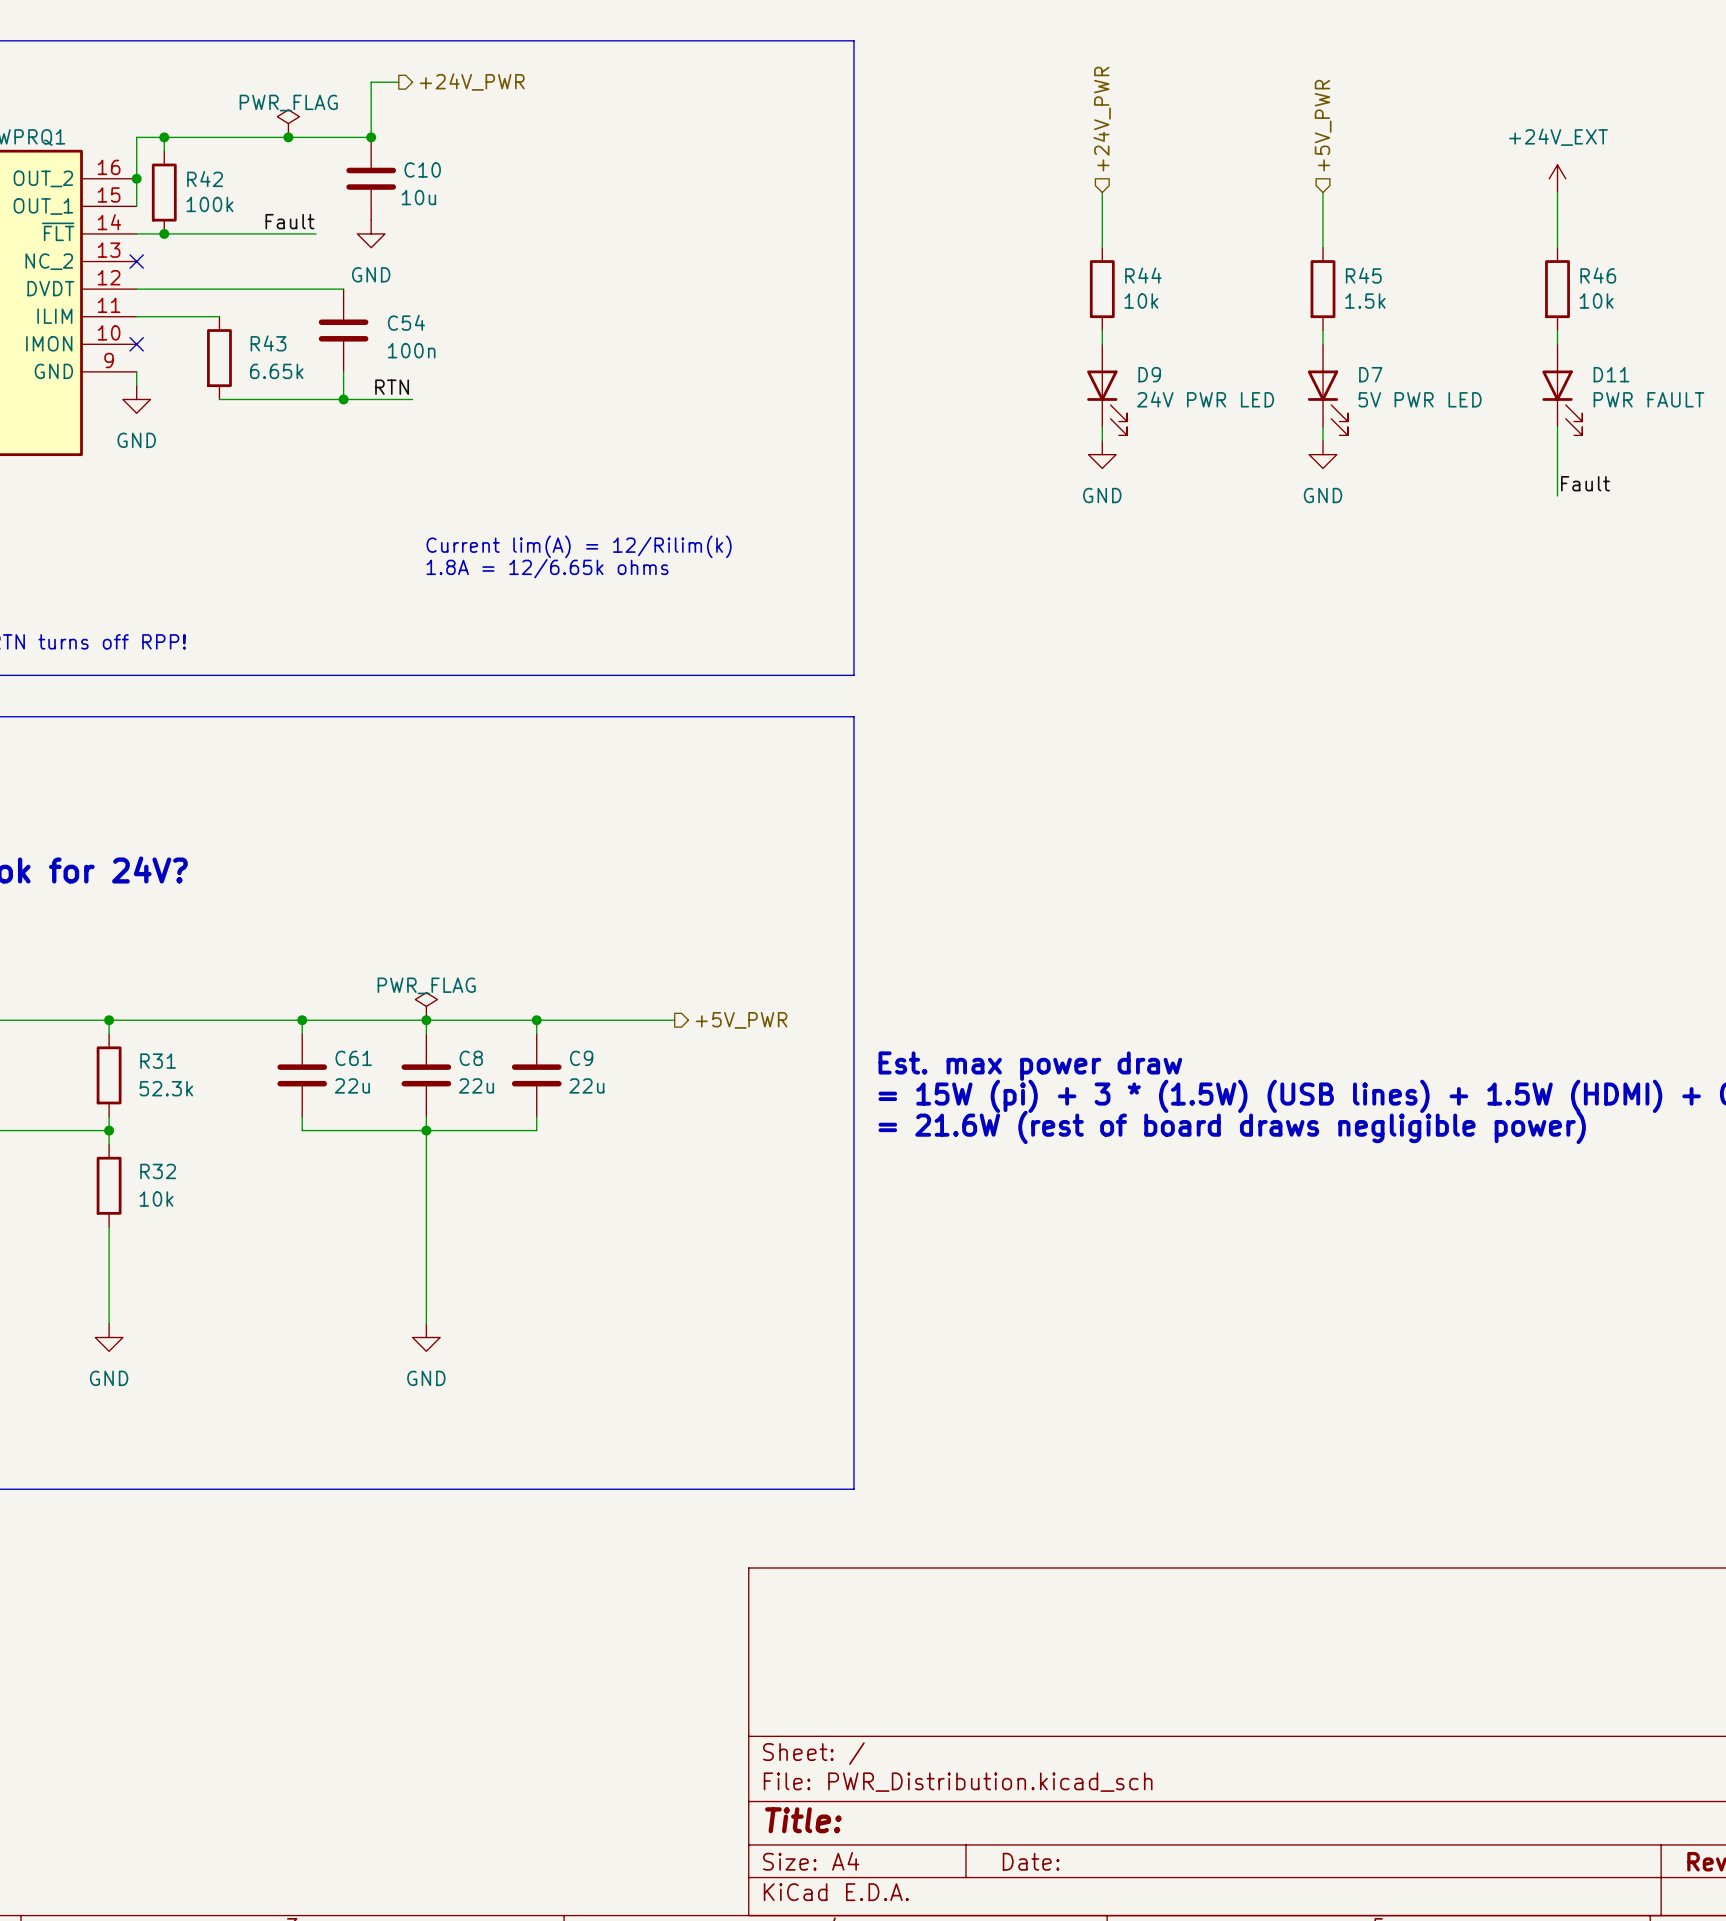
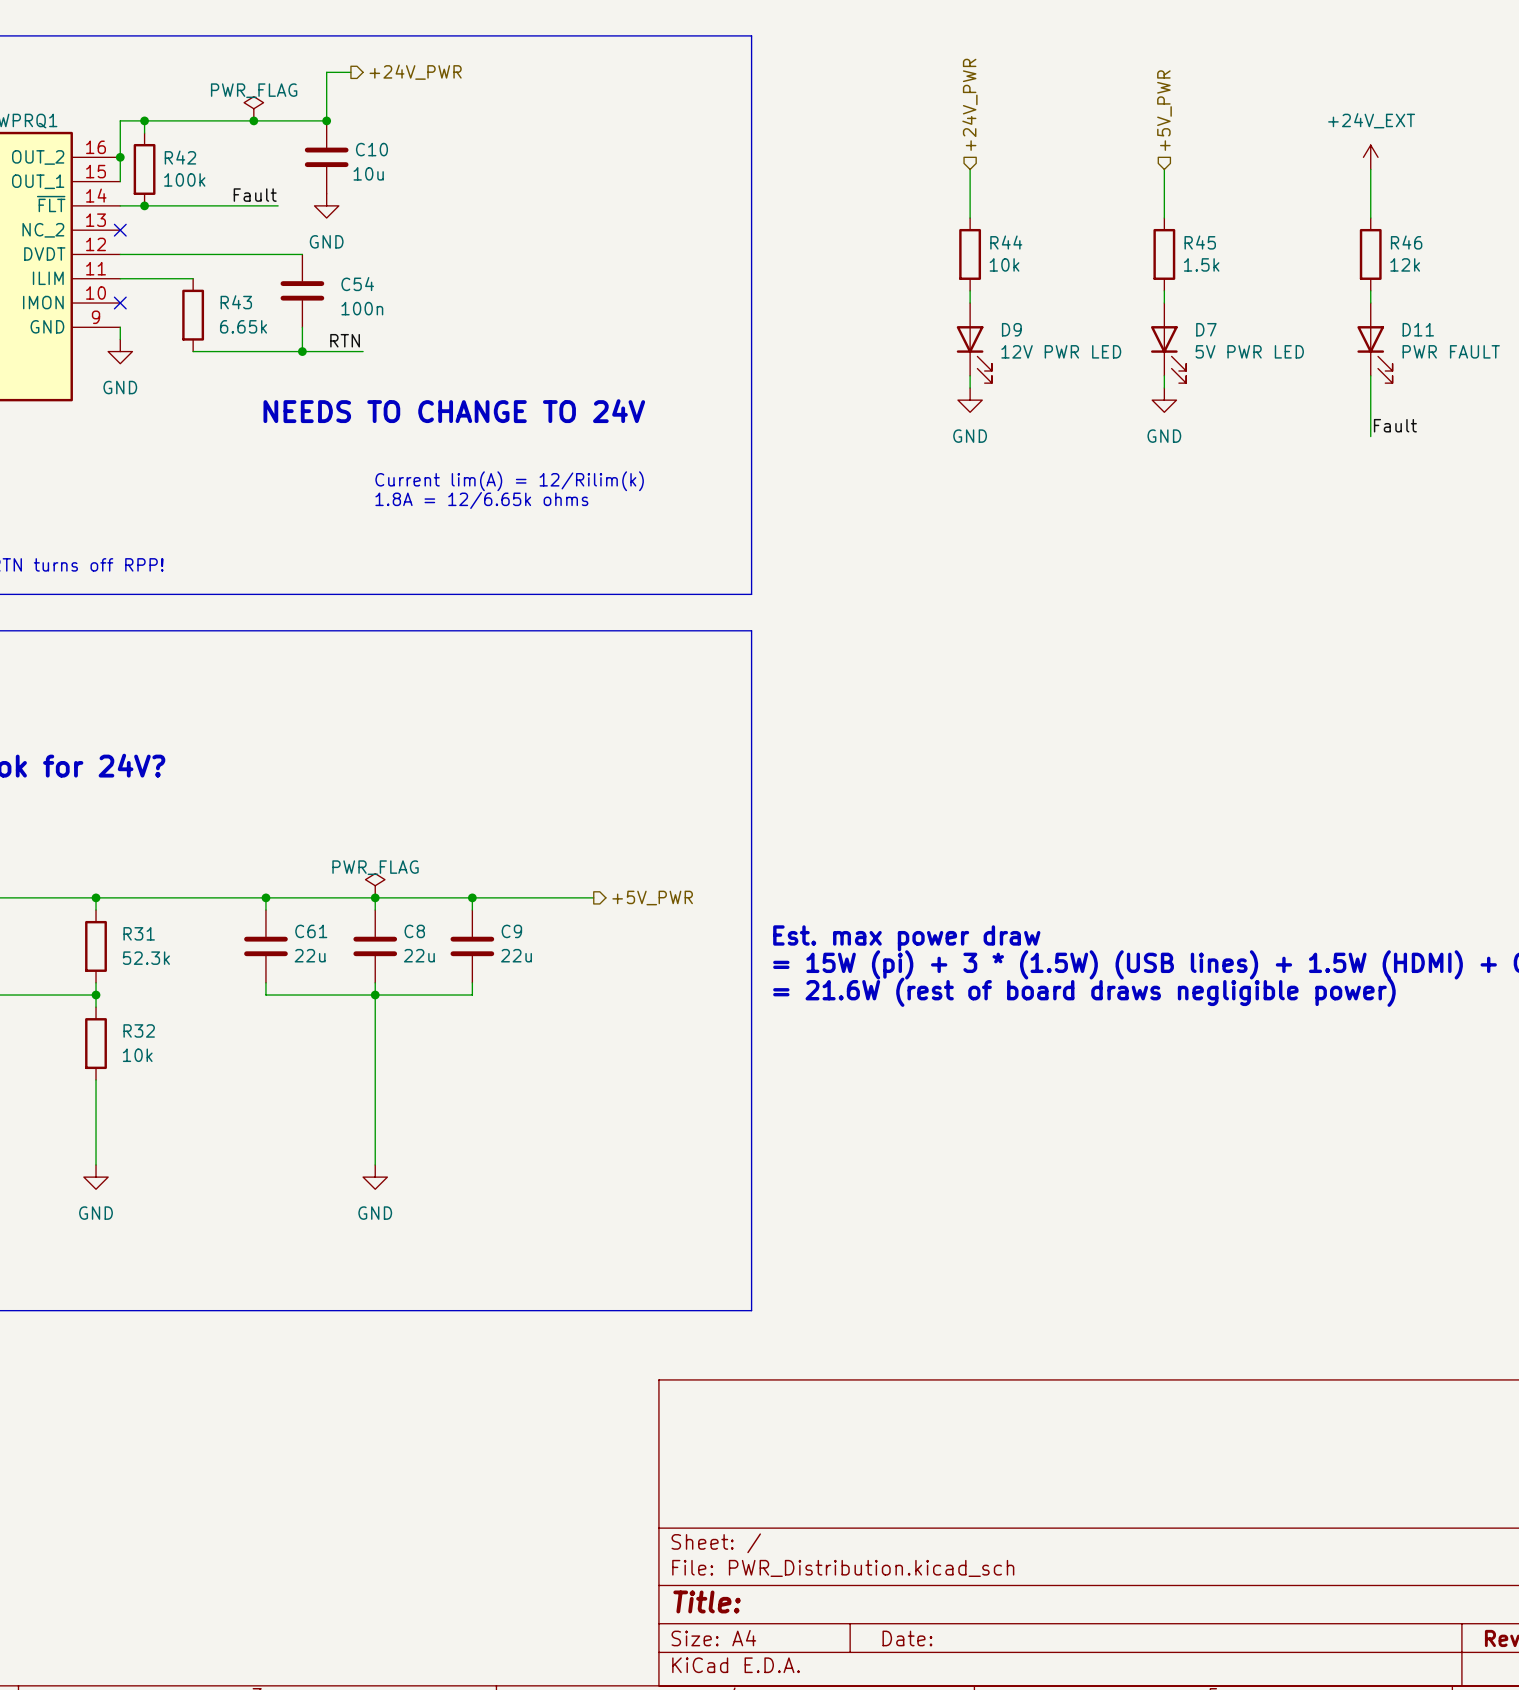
R46 value: 10k (1596, 301) -> 12k (1405, 264)
D9 value: 24V PWR LED (1205, 399) -> 12V PWR LED (1061, 351)
text: none -> NEEDS TO CHANGE TO 24V (454, 411)

